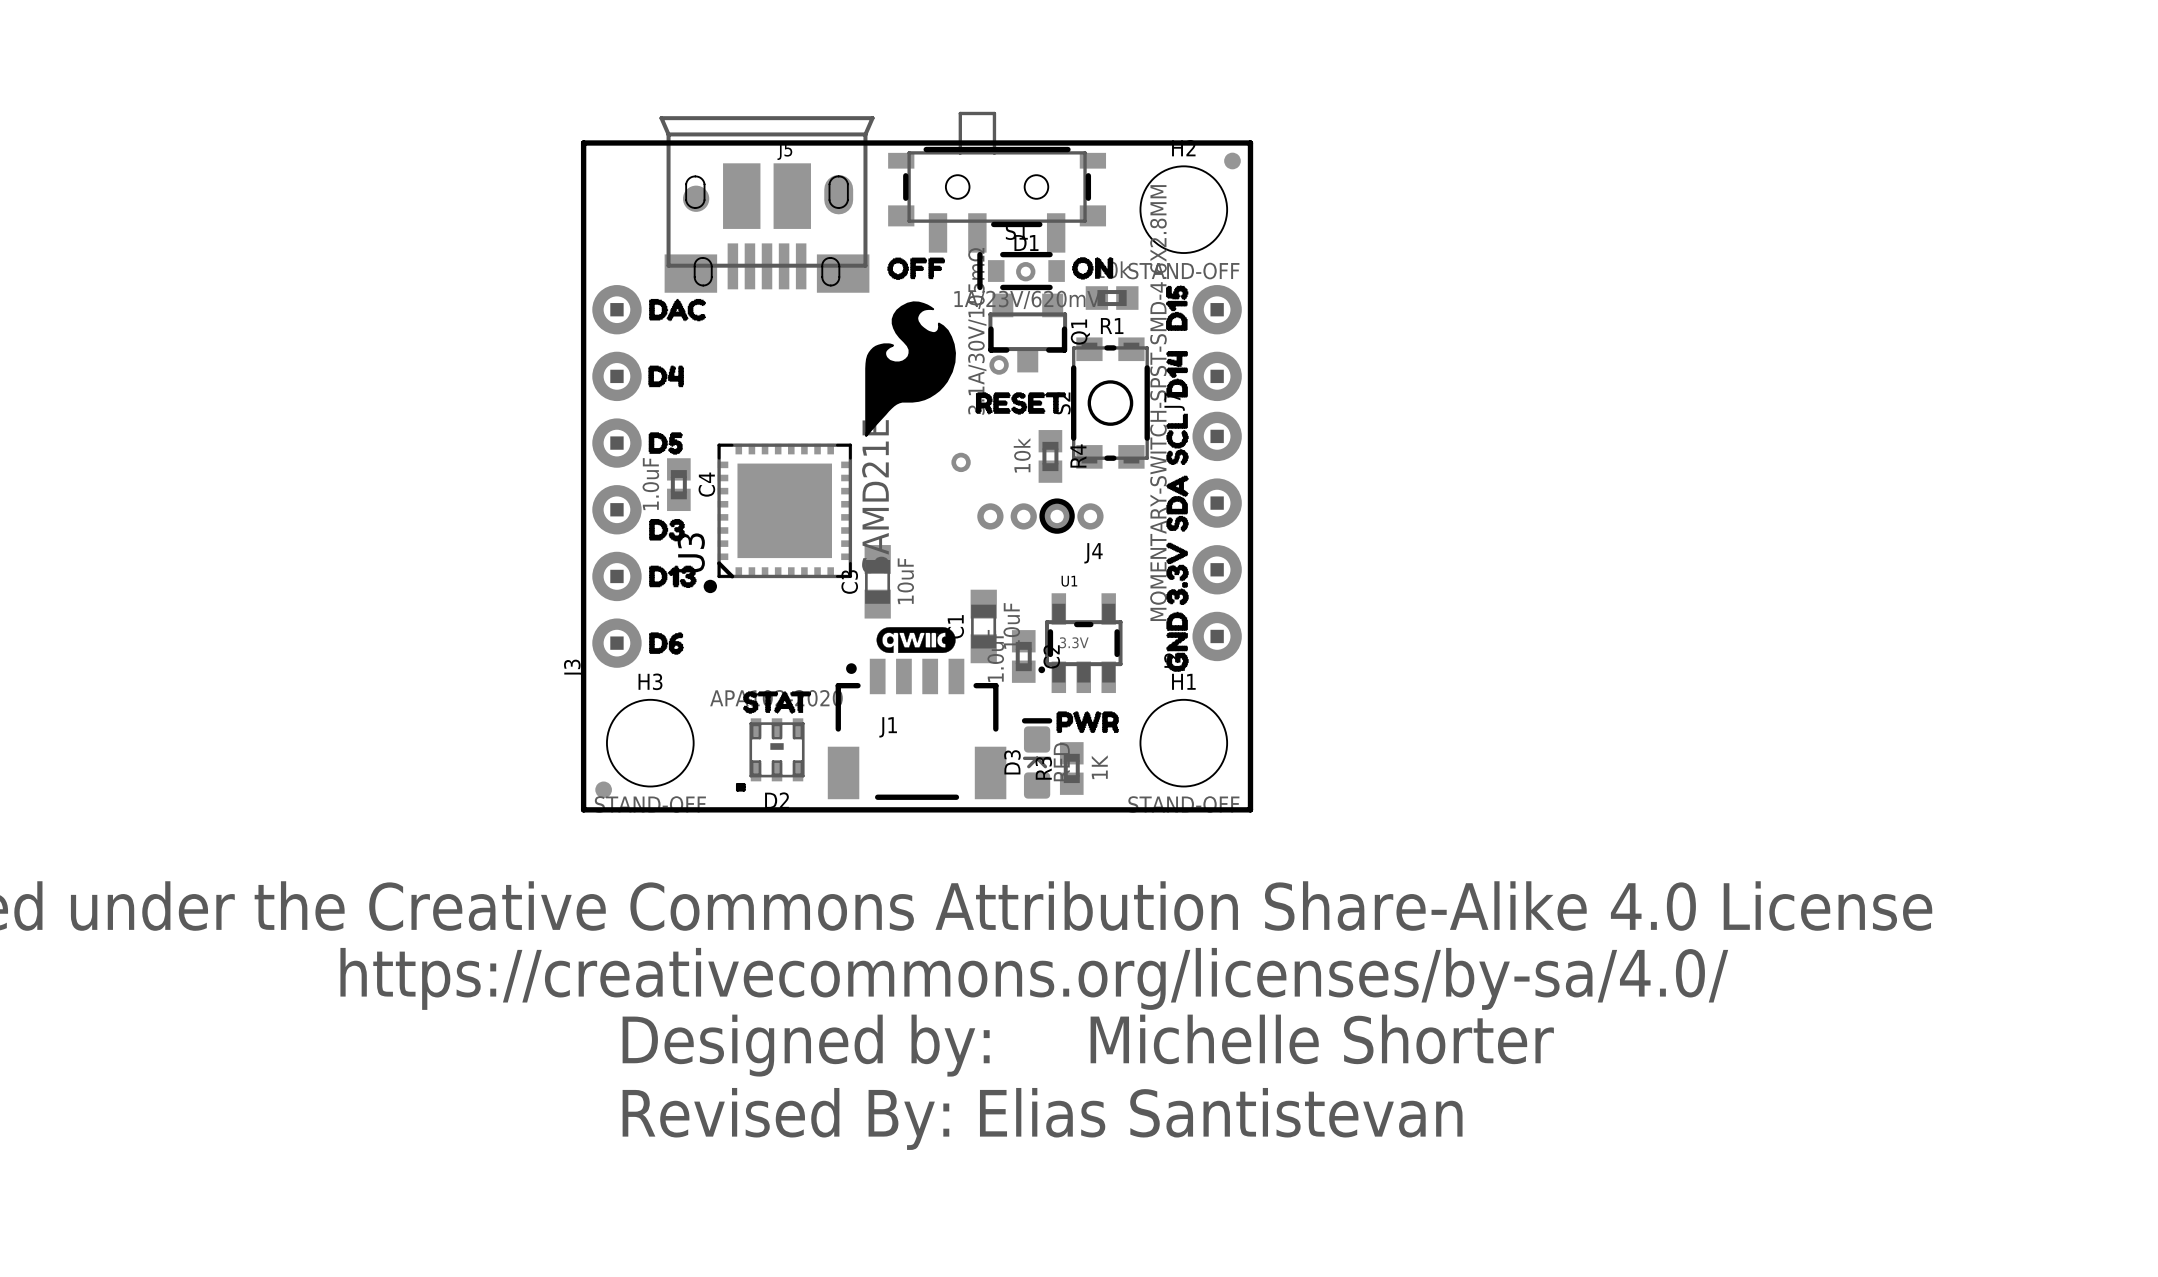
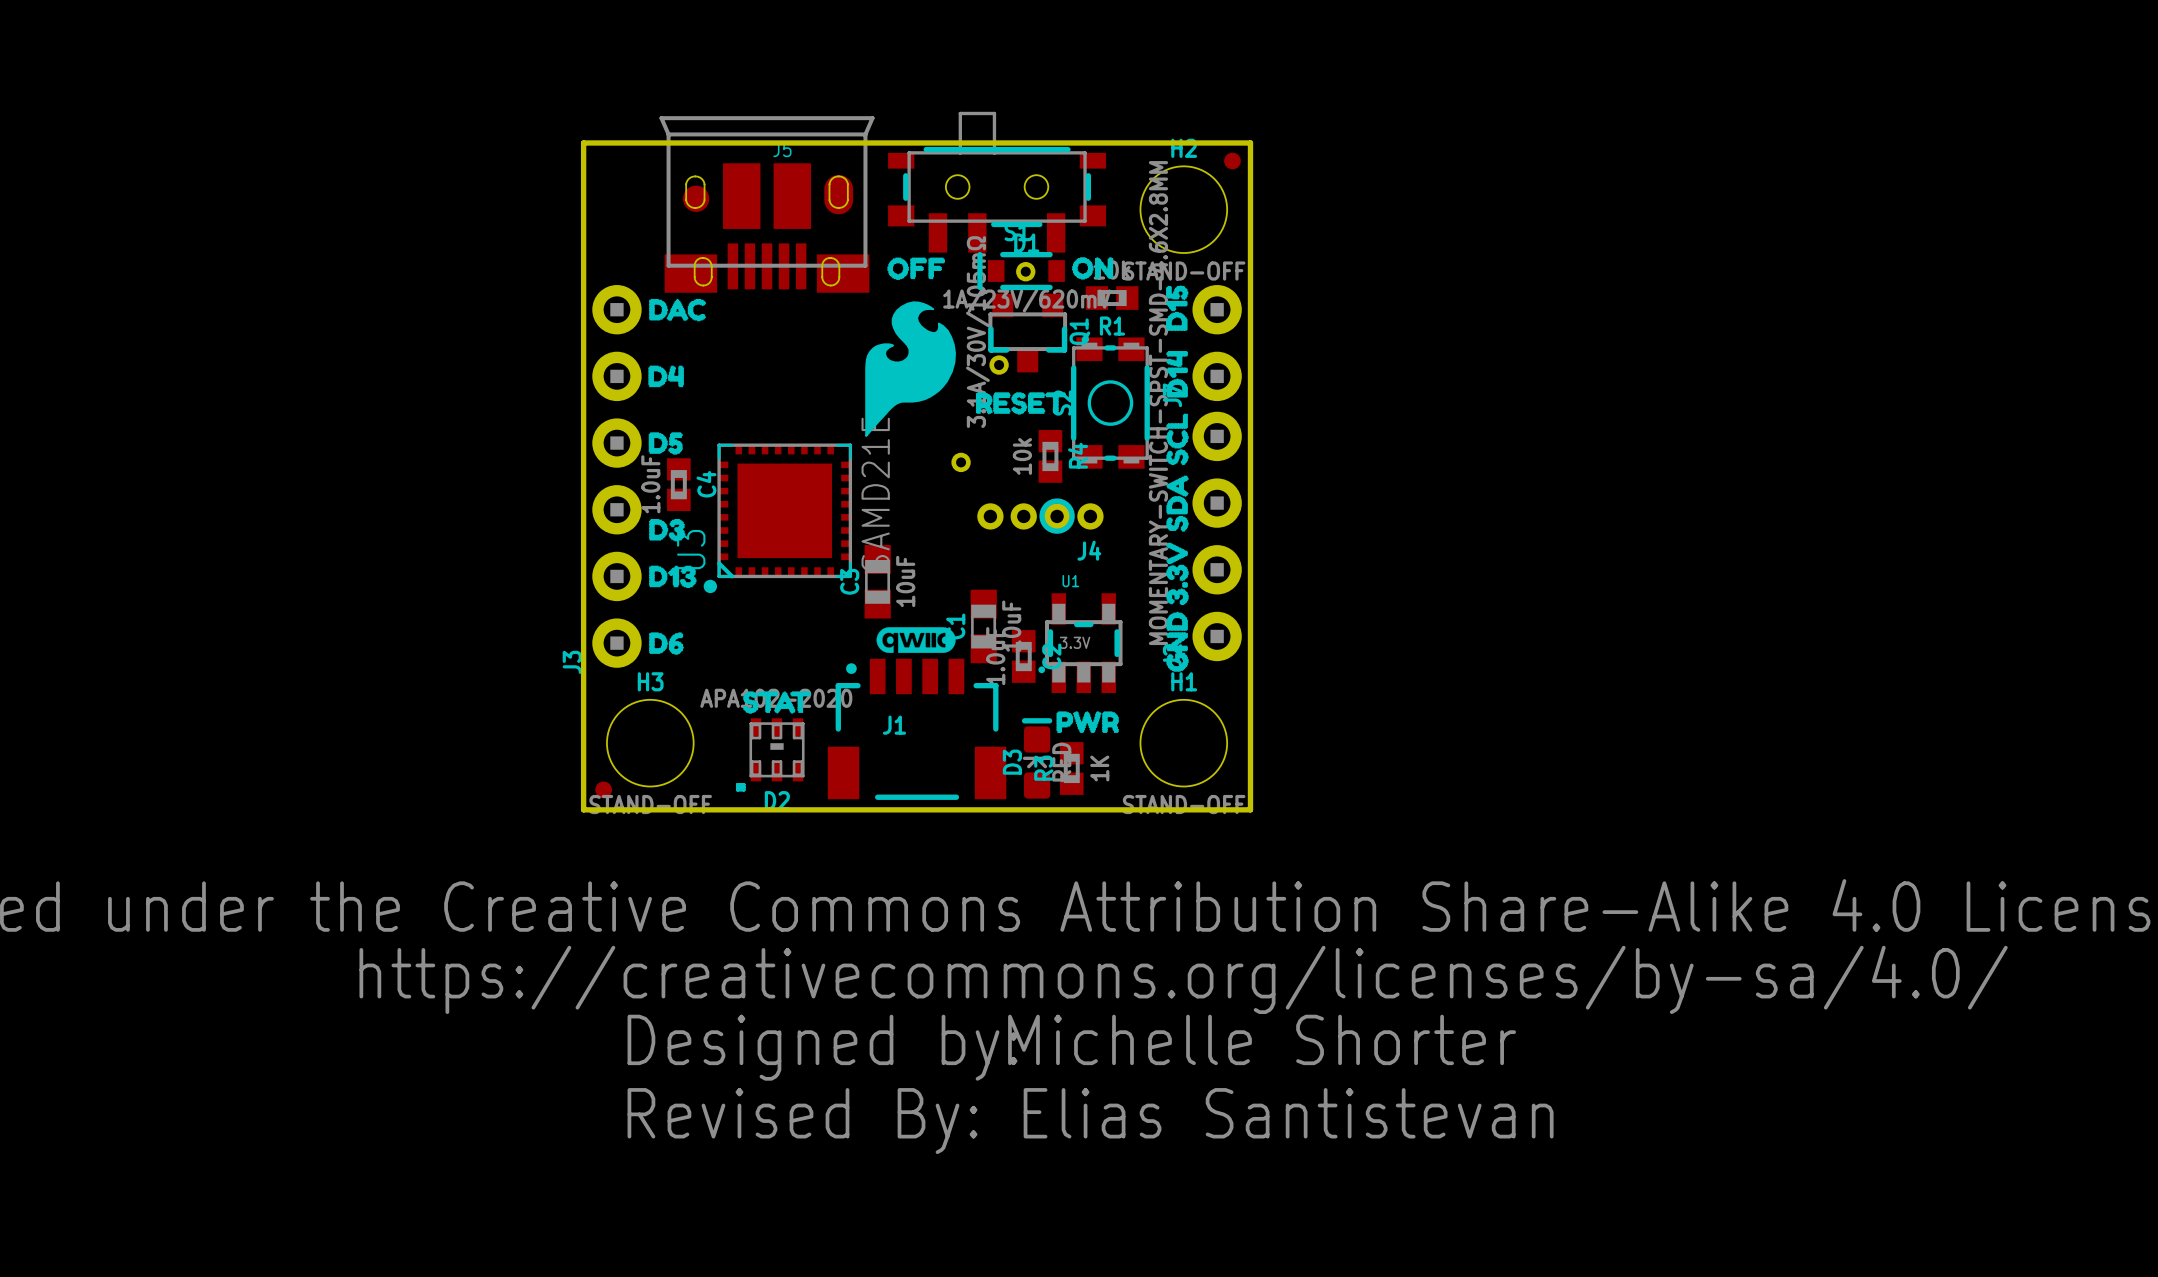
text position: Michelle Shorter (1322, 1039) -> Michelle Shorter (1262, 1039)

